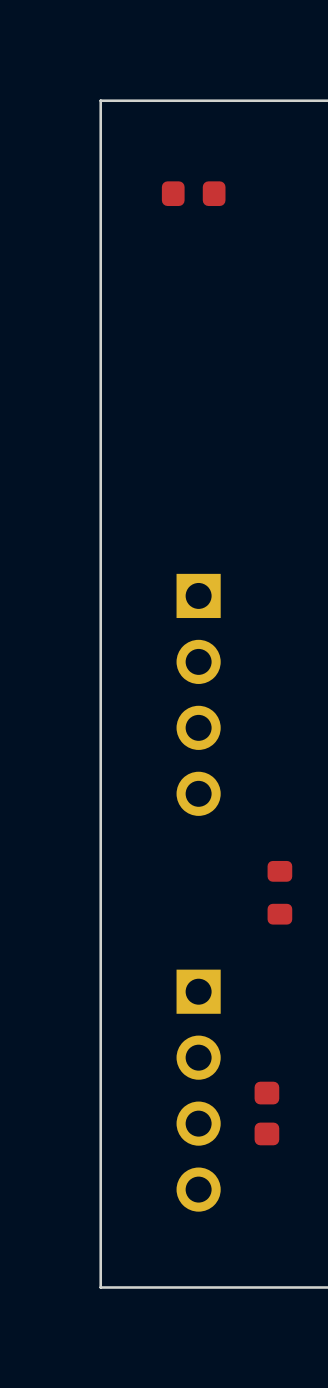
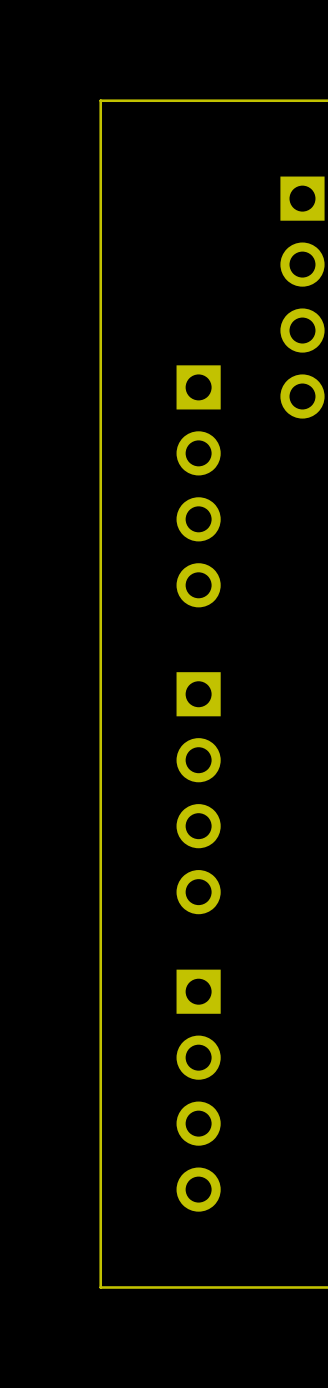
part: (193, 193) -> none
part: none -> (302, 297)
part: none -> (198, 486)
part position: (198, 694) -> (198, 793)
part: (279, 892) -> none
part: (266, 1113) -> none

